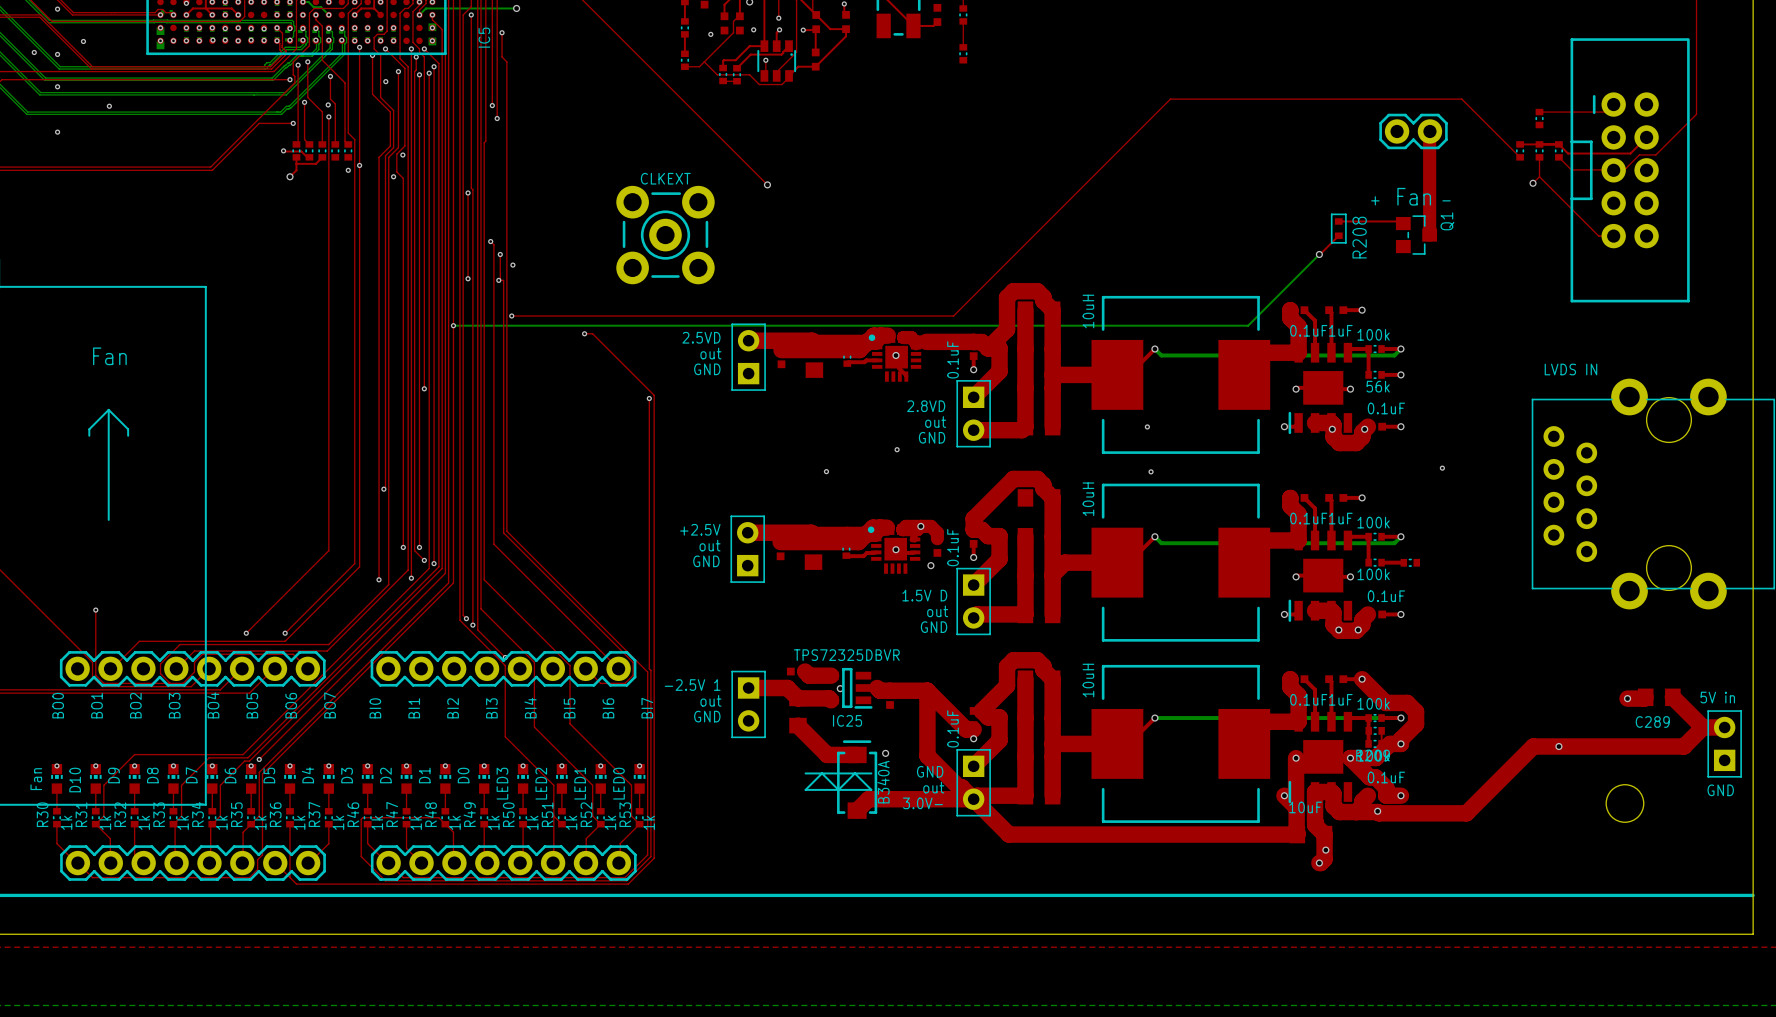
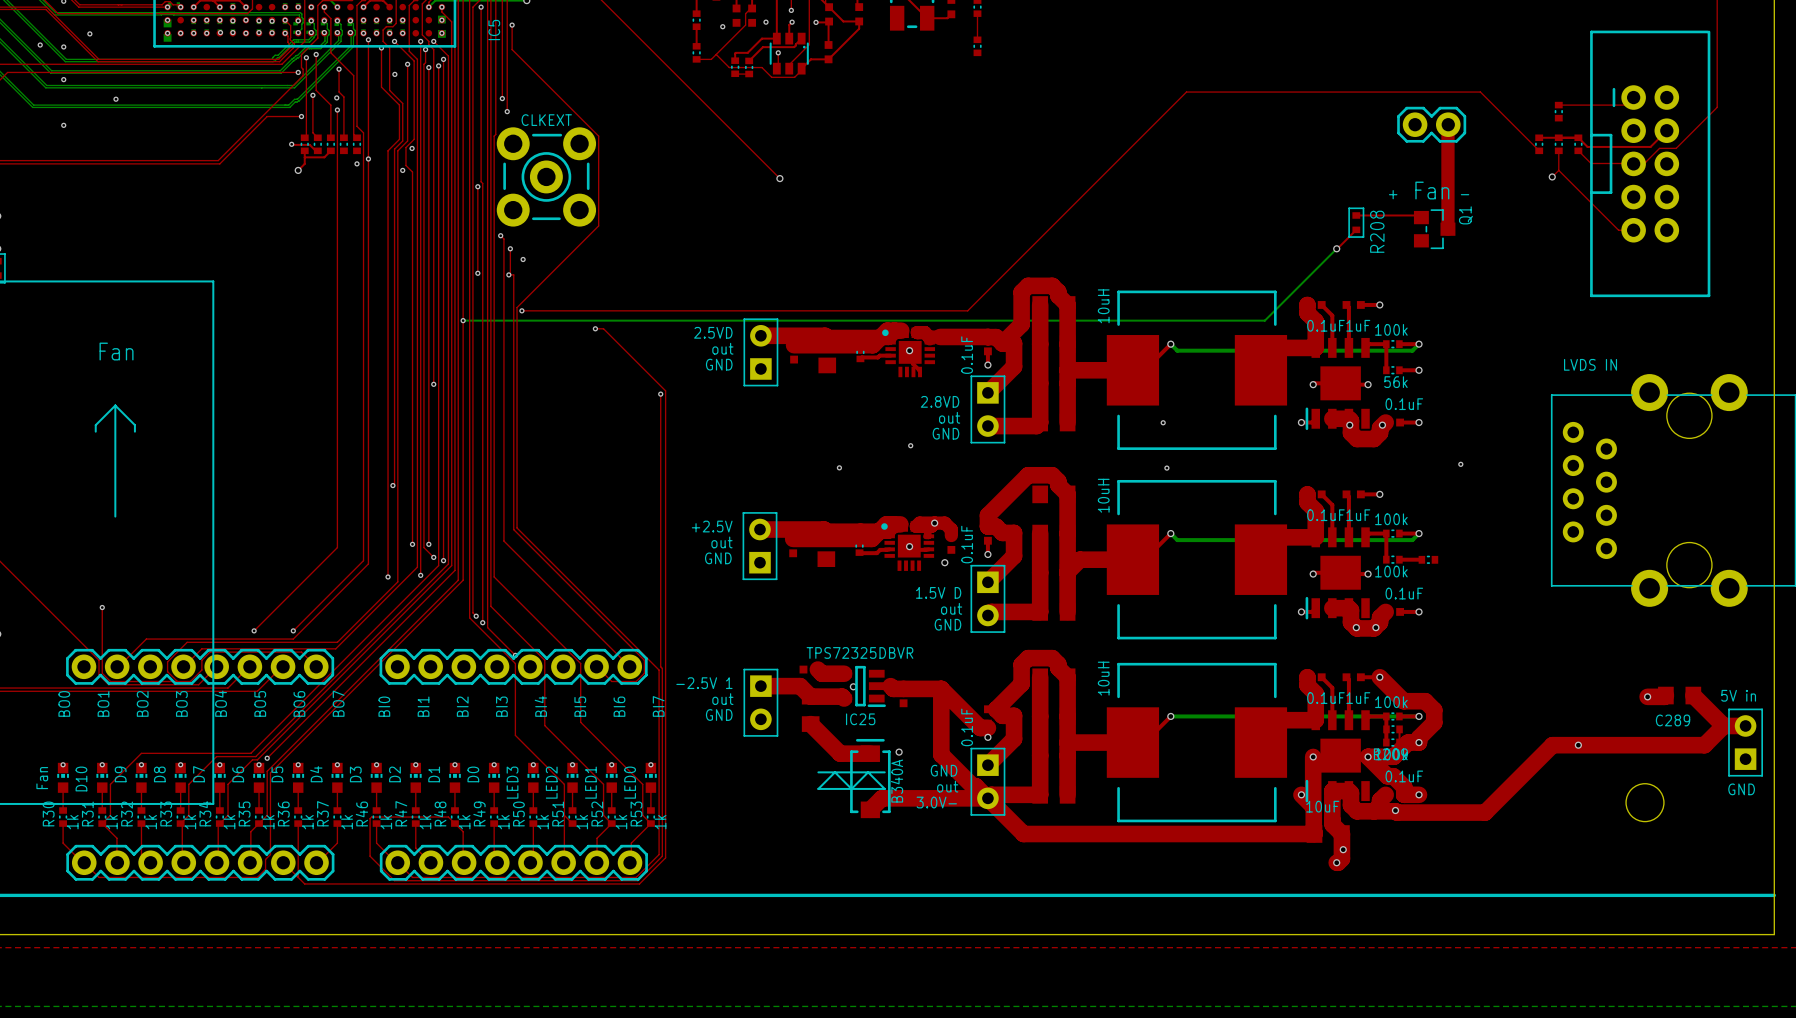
top track: (506, 61) (506, 312) -> (517, 54) (598, 136) (598, 225) (517, 307)
CLKEXT position: (665, 235) -> (546, 176)

